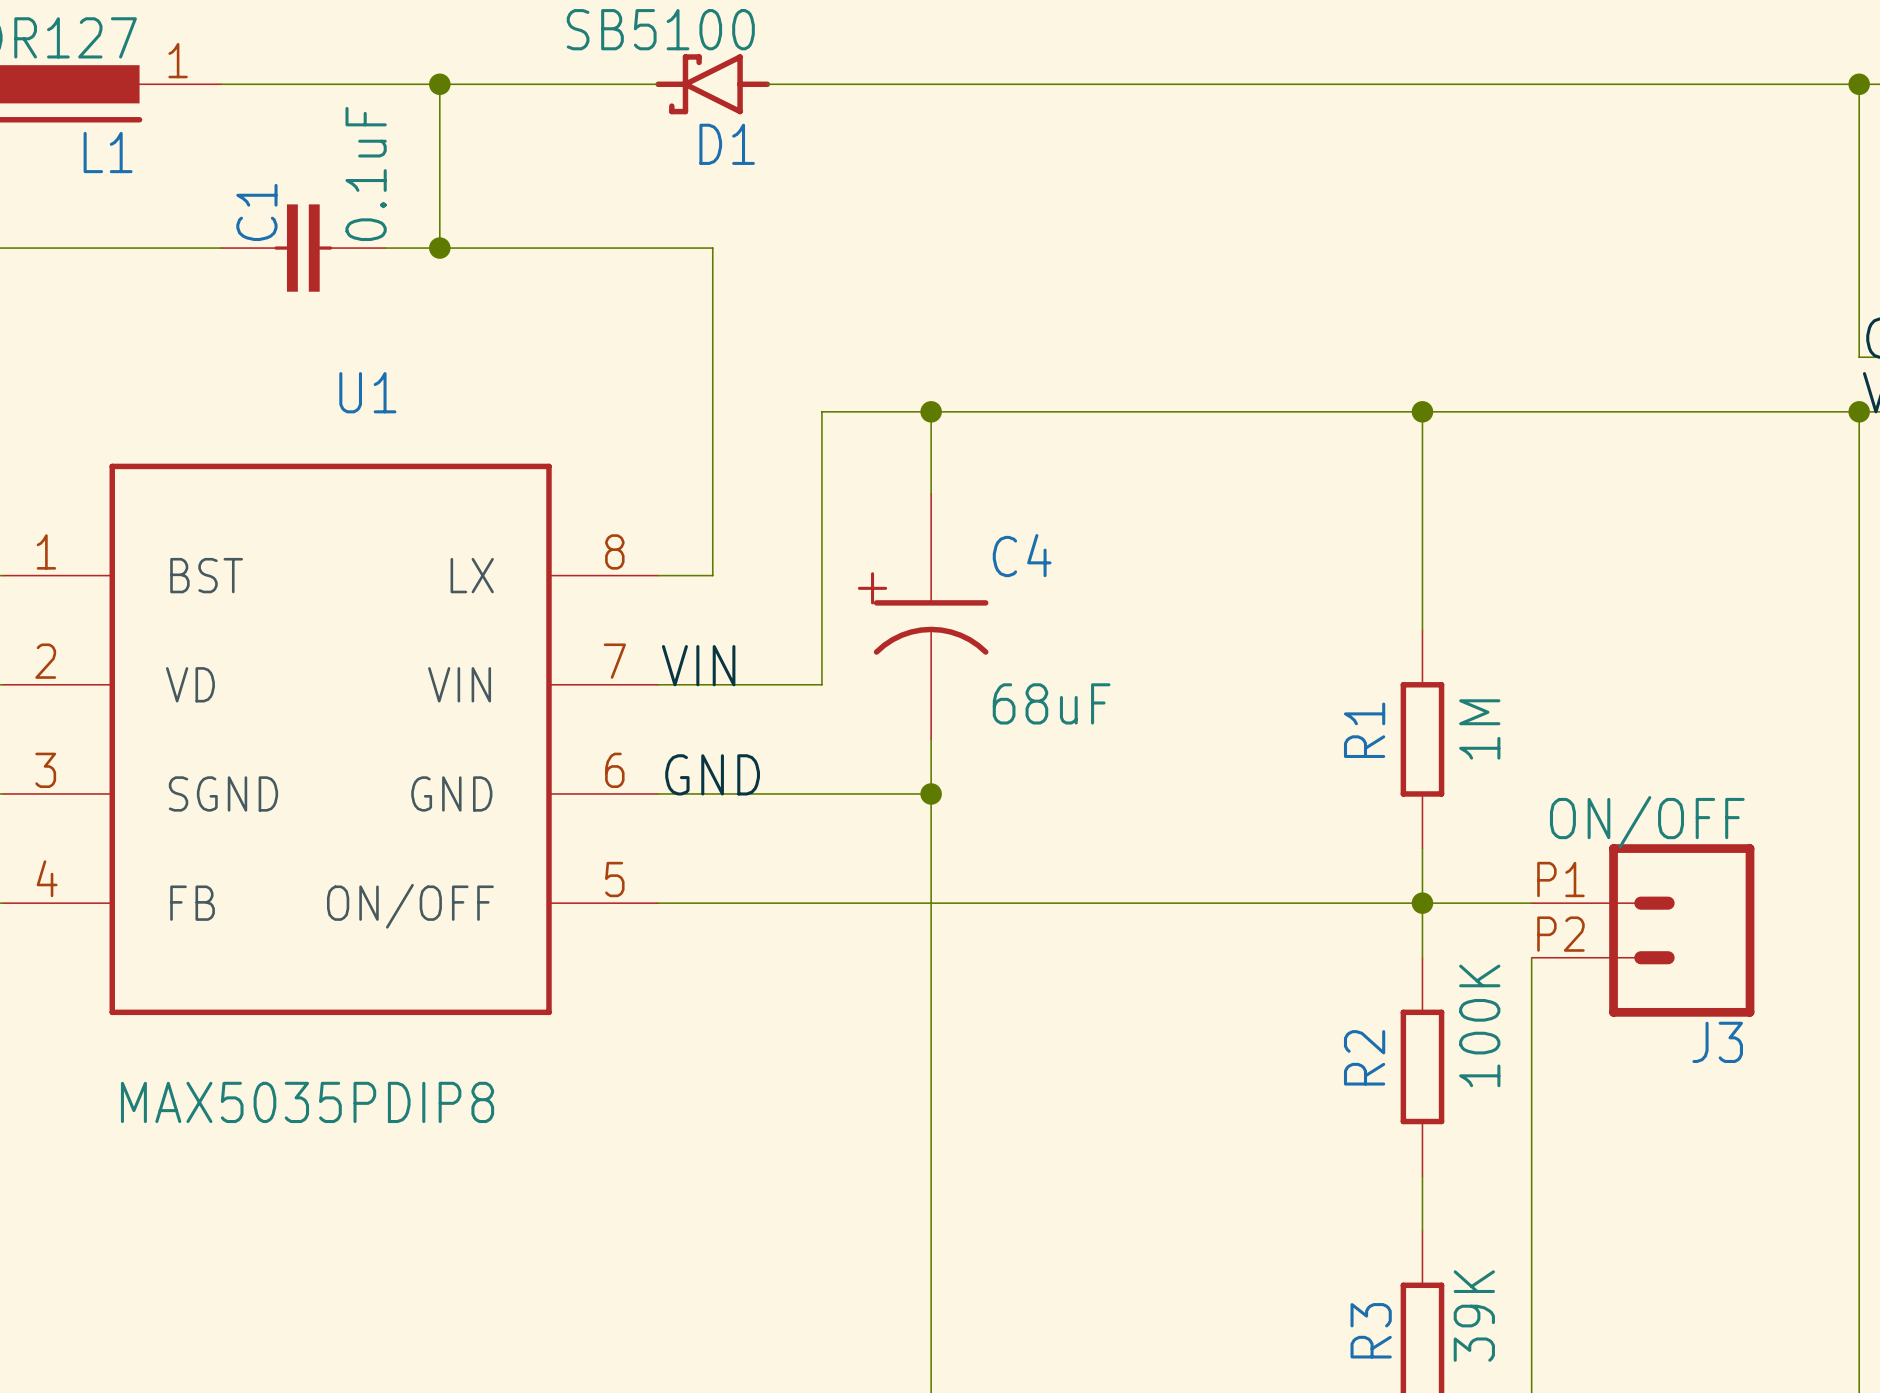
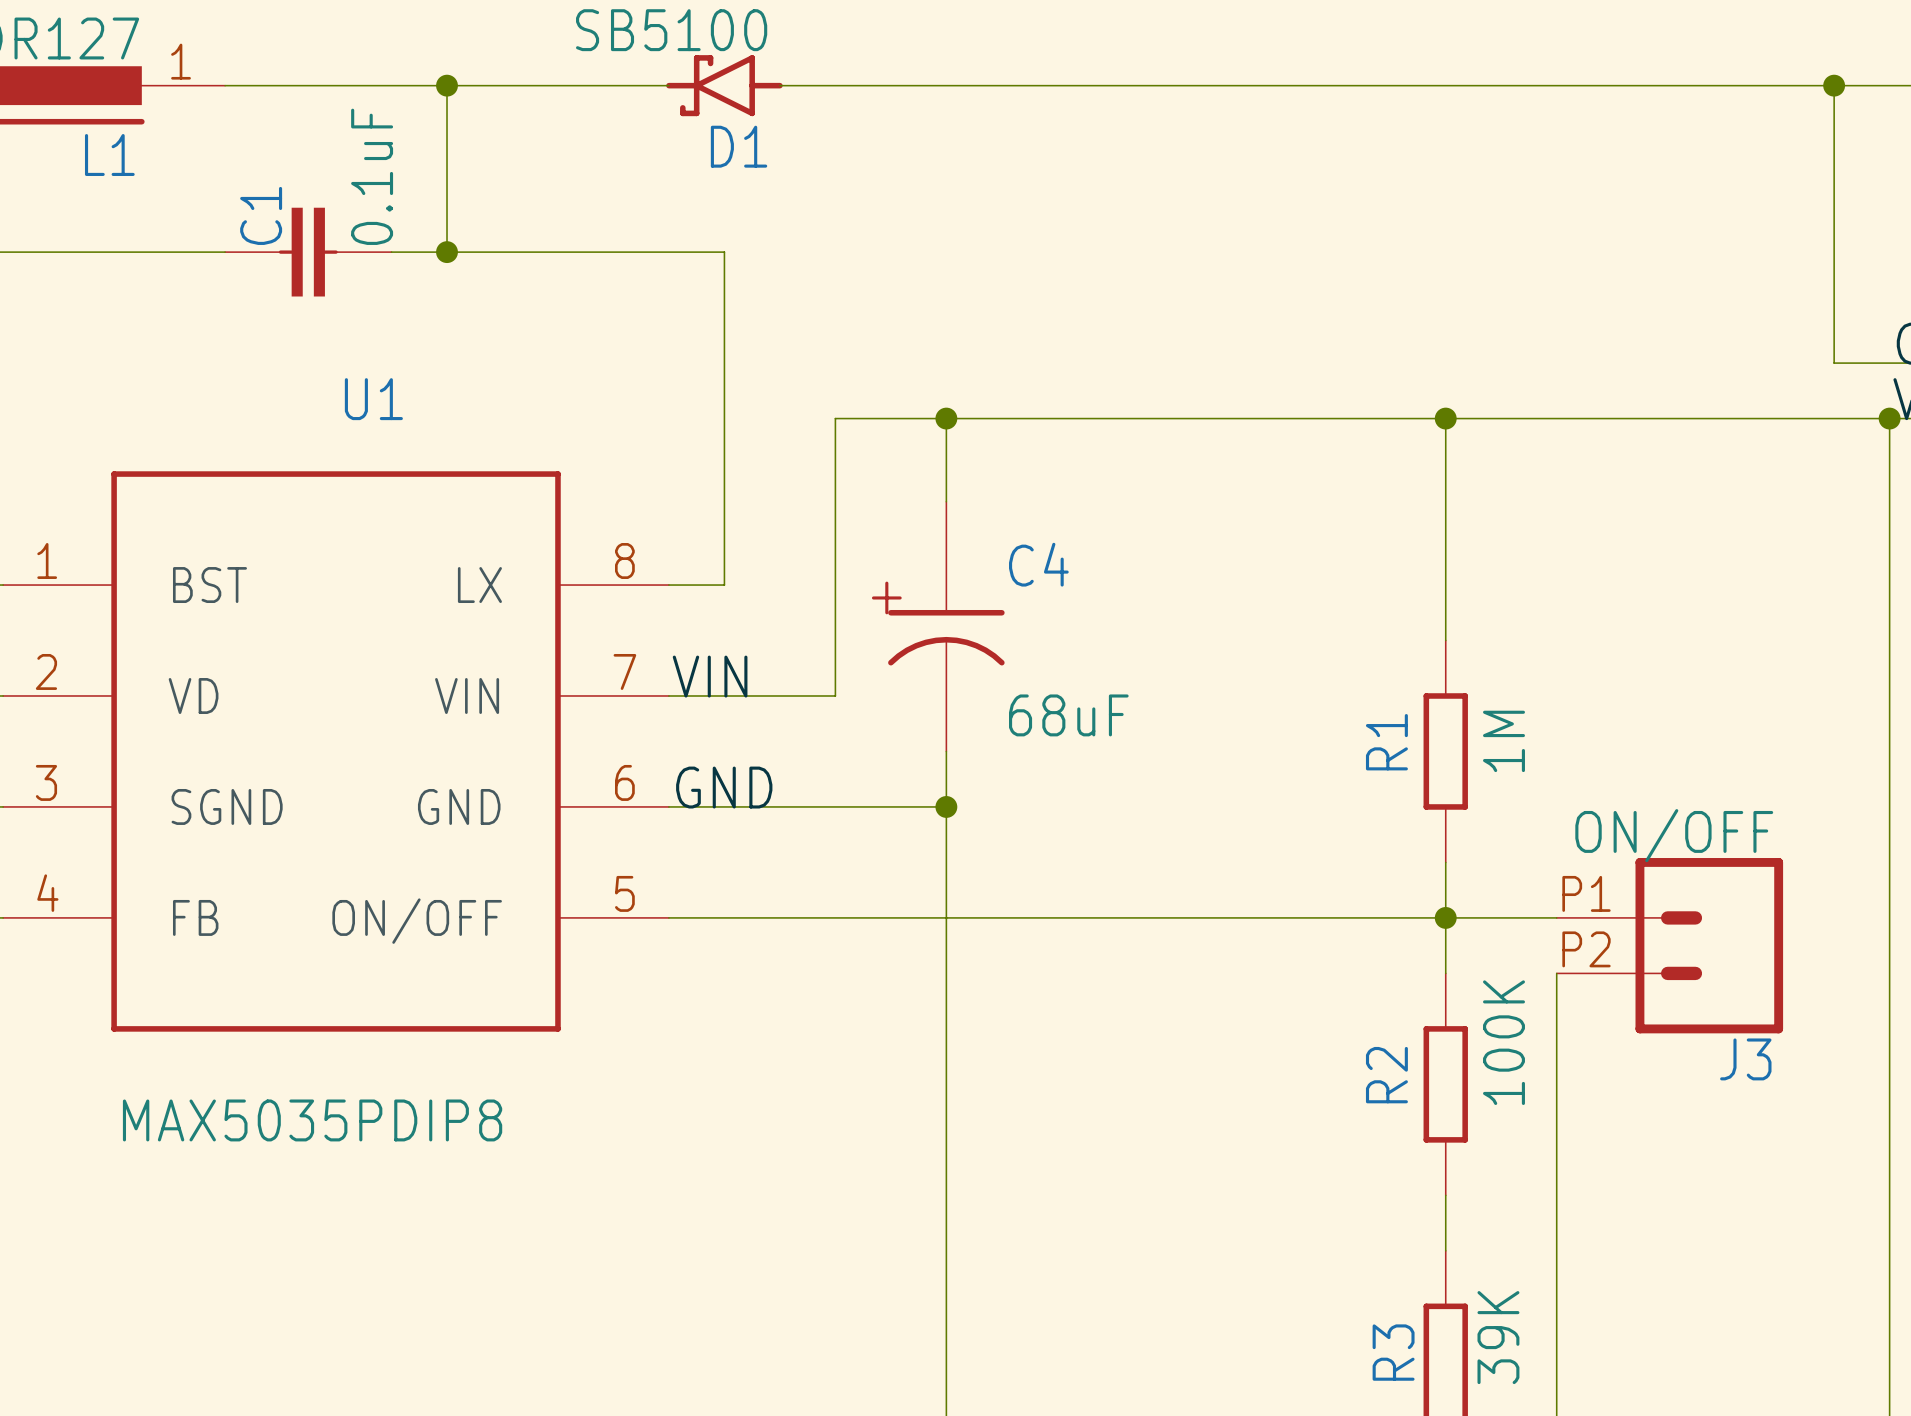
wire: (1859, 84) (1859, 357) -> (1834, 85) (1834, 363) (1889, 363)
junction position: (1859, 84) -> (1834, 85)

